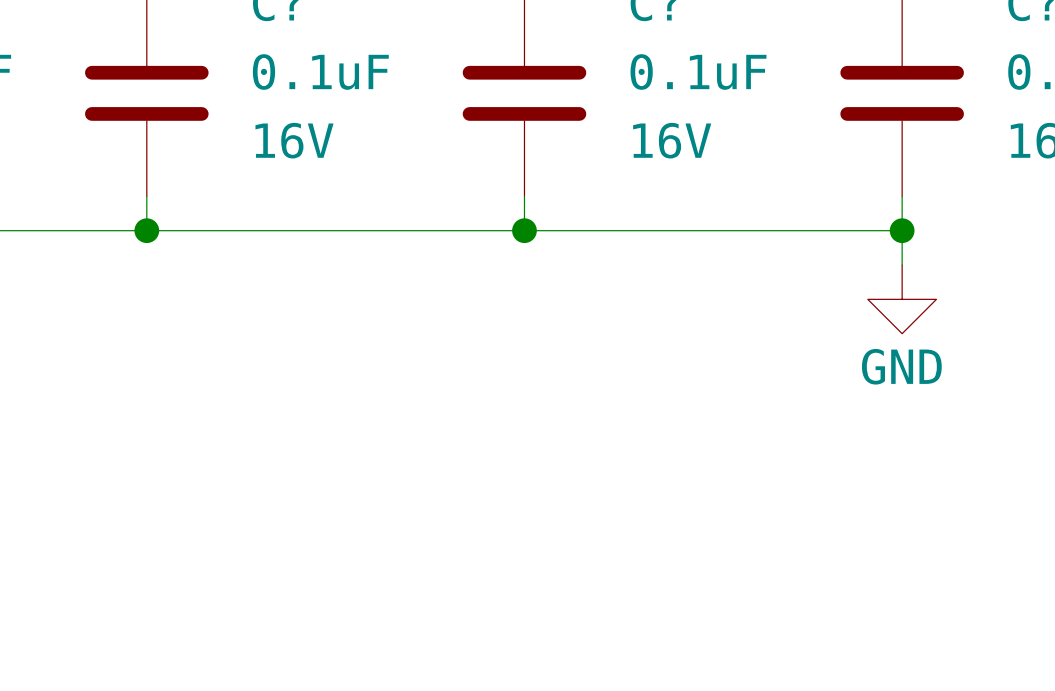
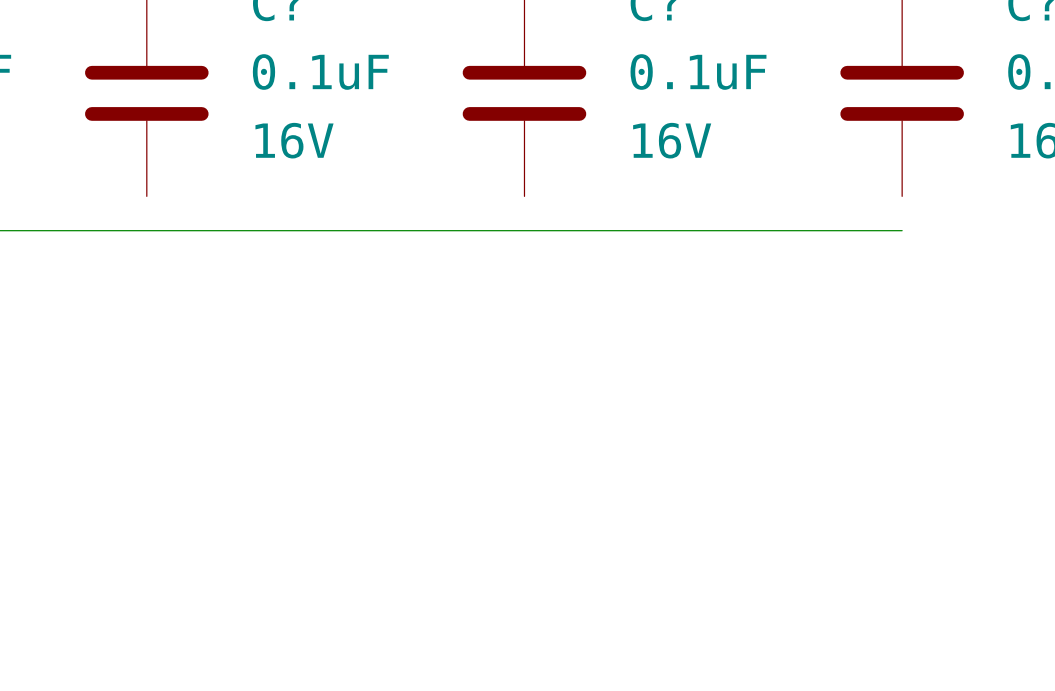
wire: (146, 196) (146, 230) -> none
wire: (524, 196) (524, 230) -> none
wire: (902, 196) (902, 265) -> none
junction: (146, 230) -> none
junction: (524, 230) -> none
junction: (902, 230) -> none
power symbol: GND (902, 299) -> none

